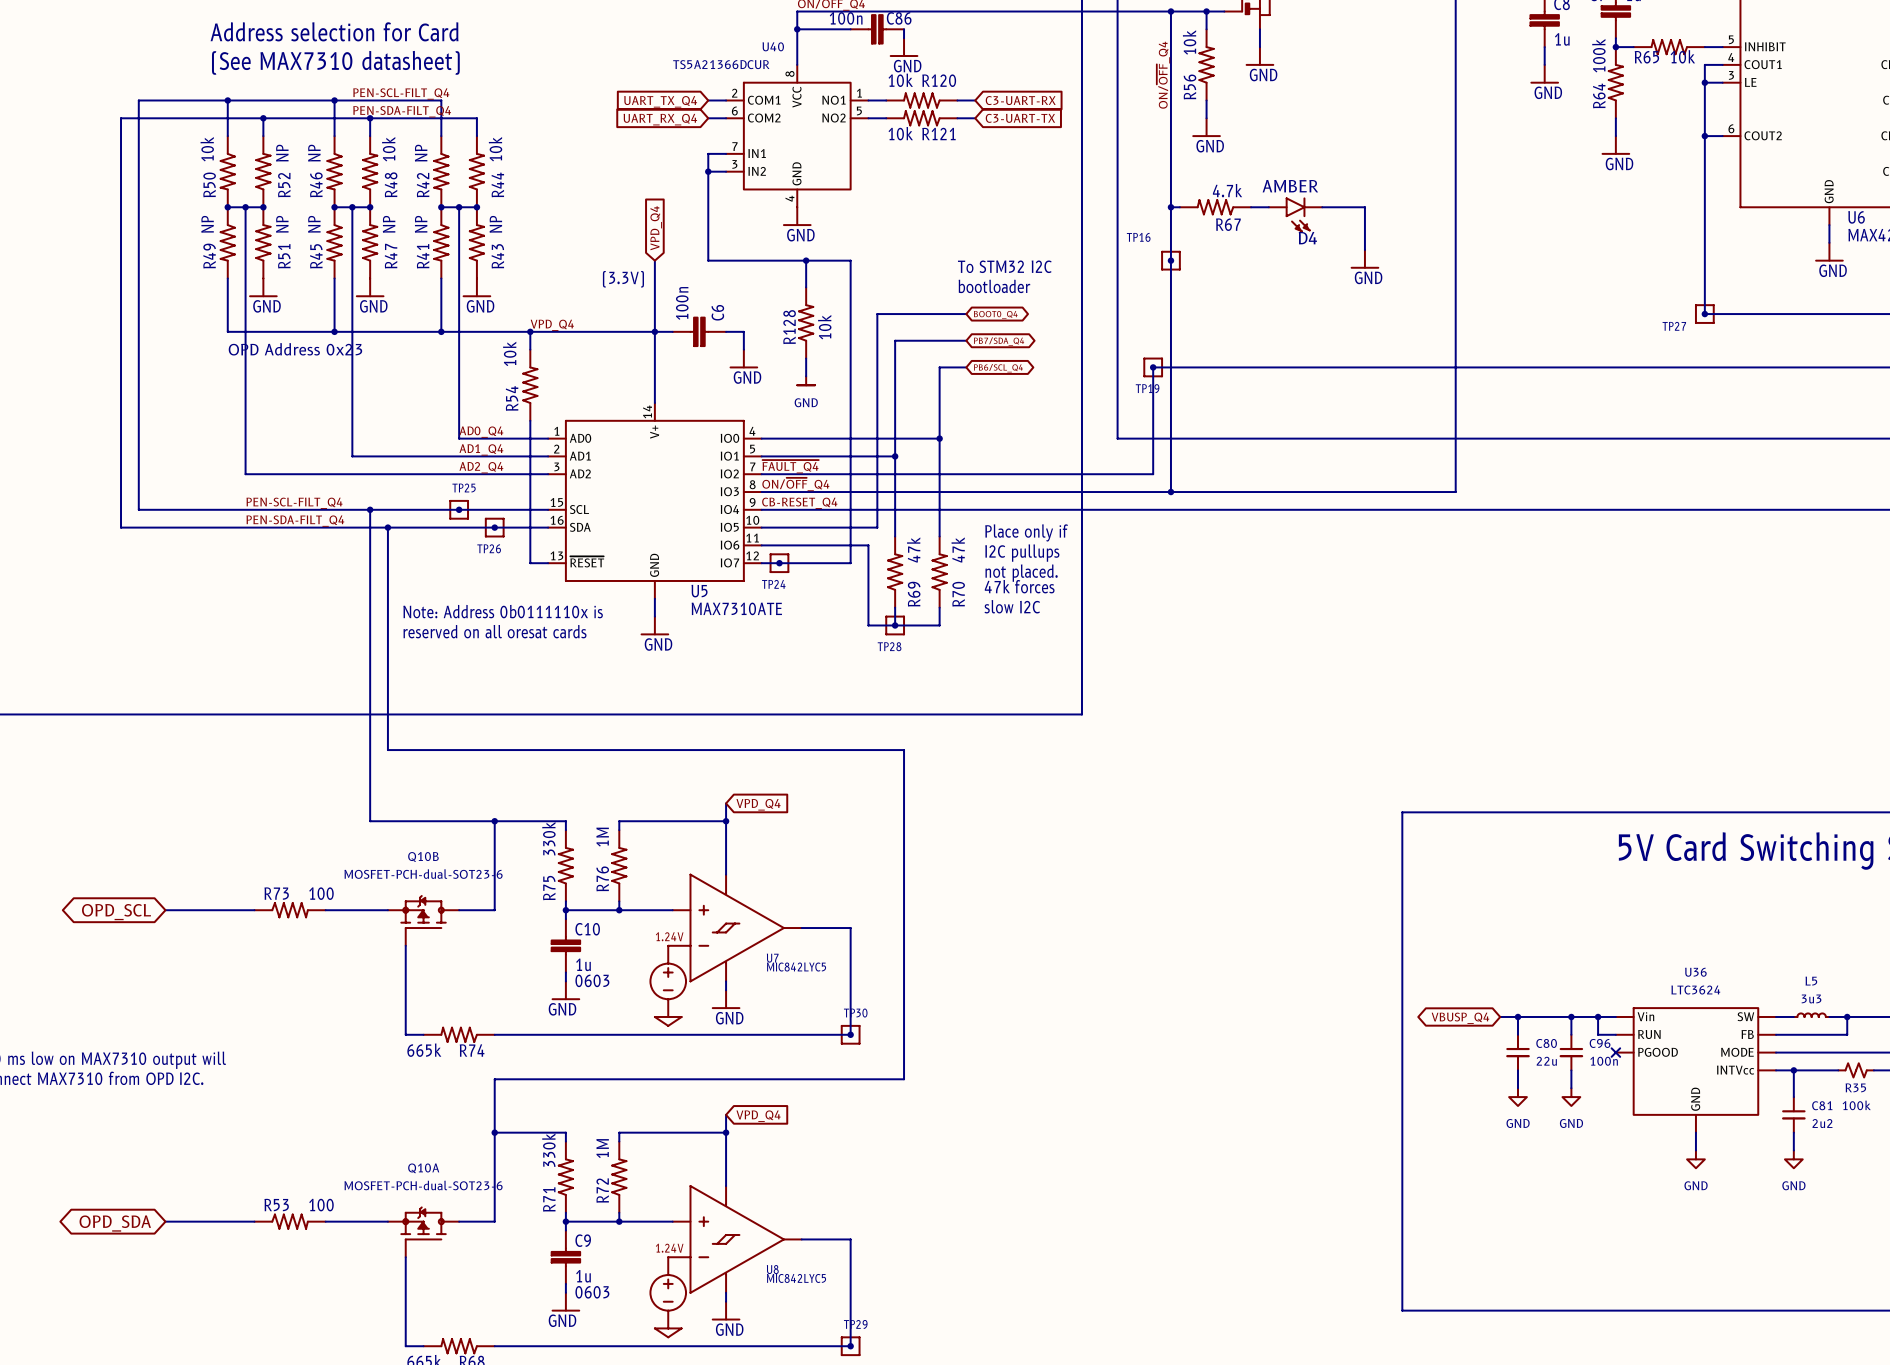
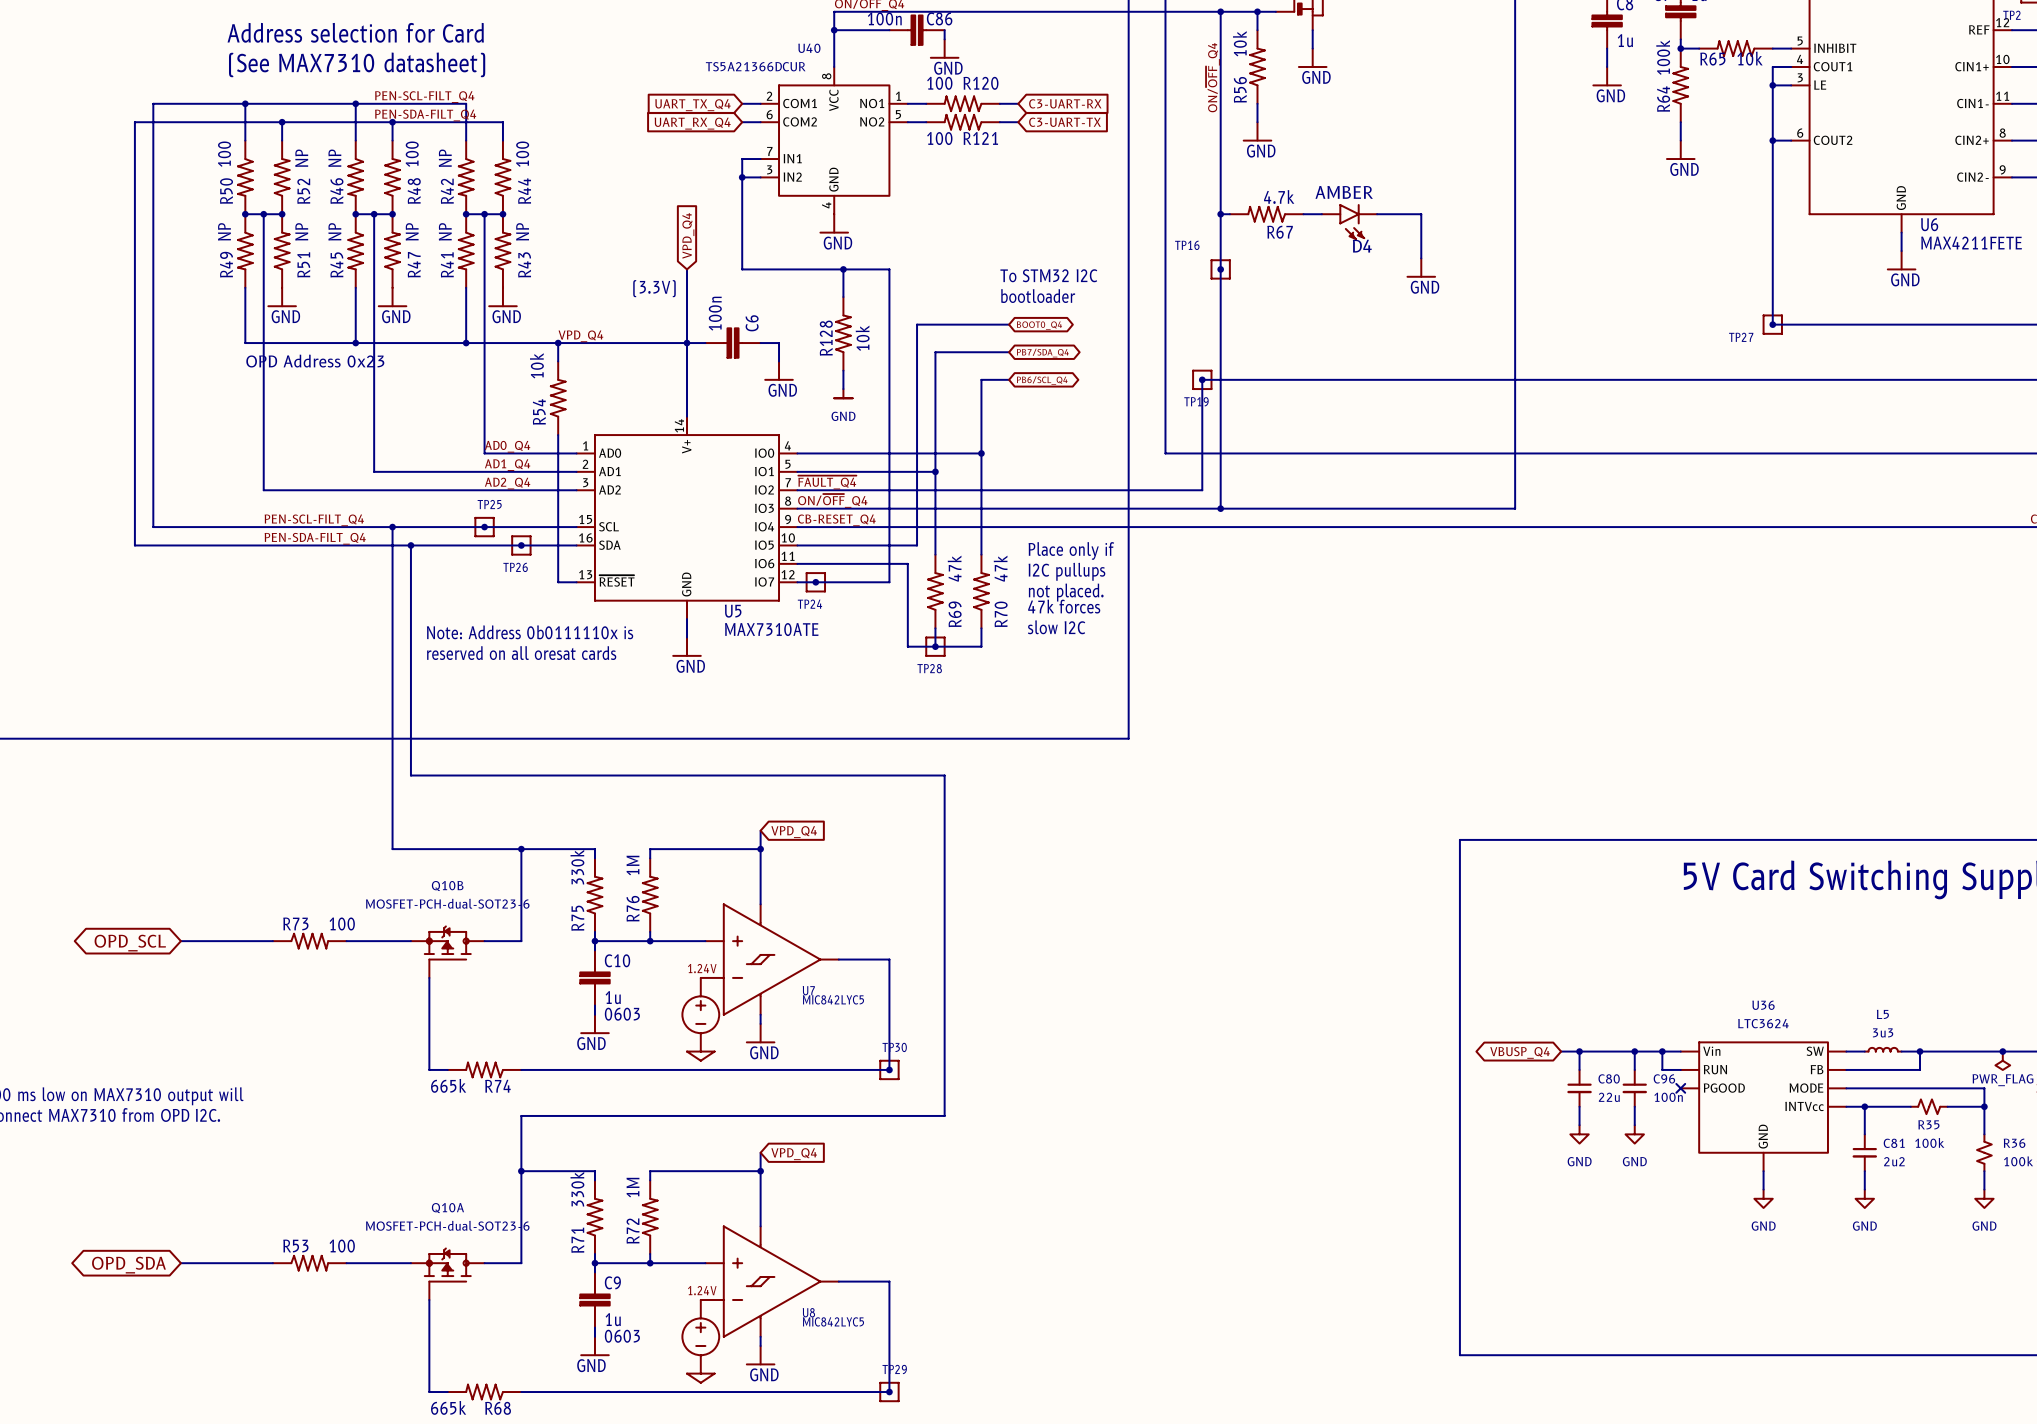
R120 value: 10k (900, 80) -> 100 (939, 83)
R121 value: 10k (900, 133) -> 100 (939, 138)
R50 value: 10k (207, 149) -> 100 (224, 154)
R48 value: 10k (388, 149) -> 100 (412, 154)
R44 value: 10k (495, 149) -> 100 (522, 154)

